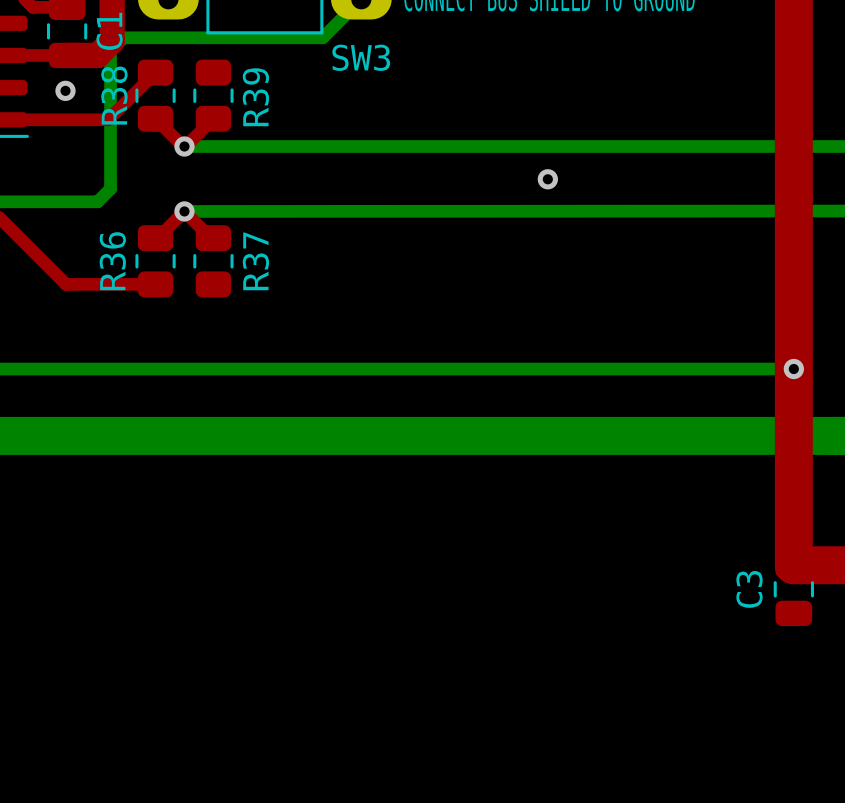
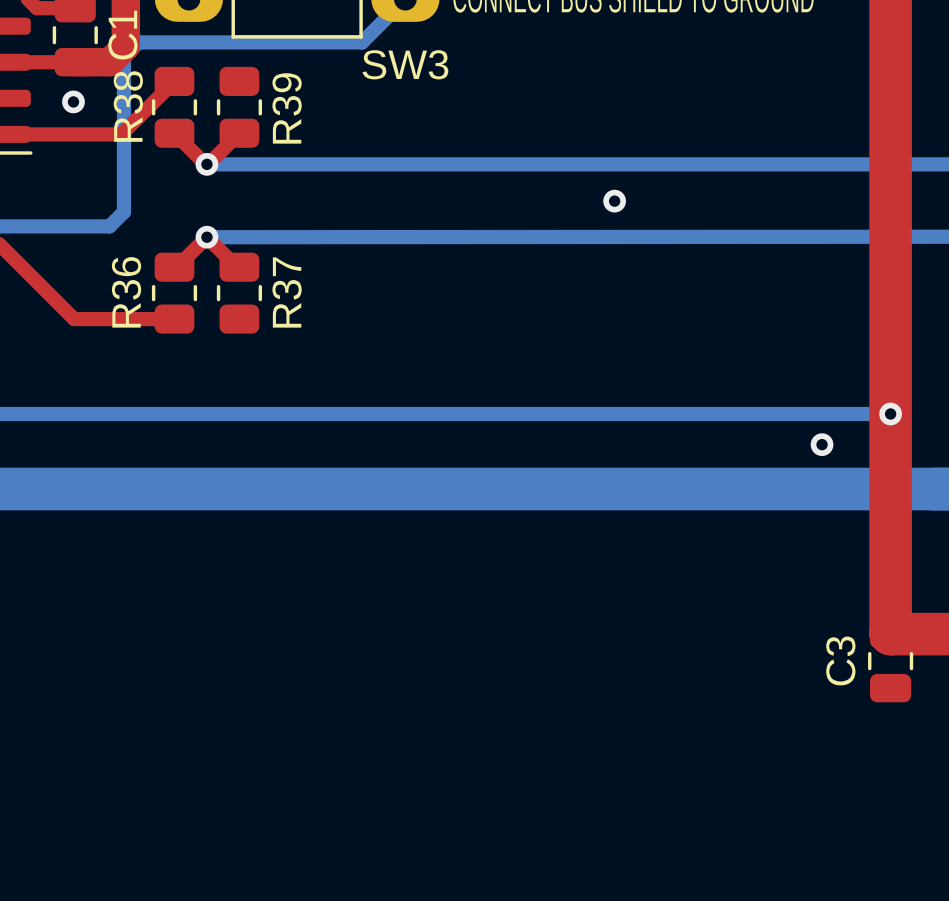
via: none -> (822, 444)

